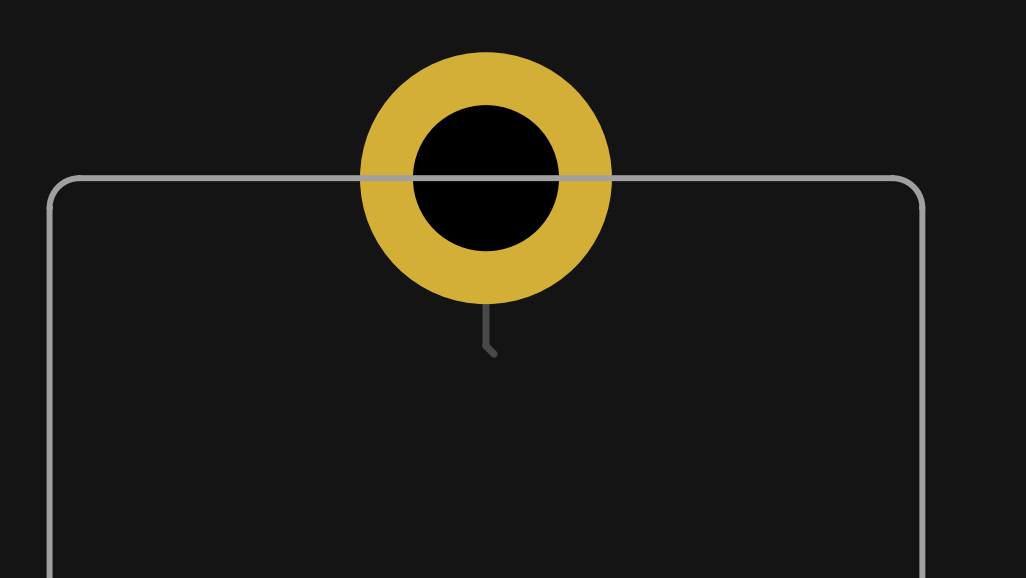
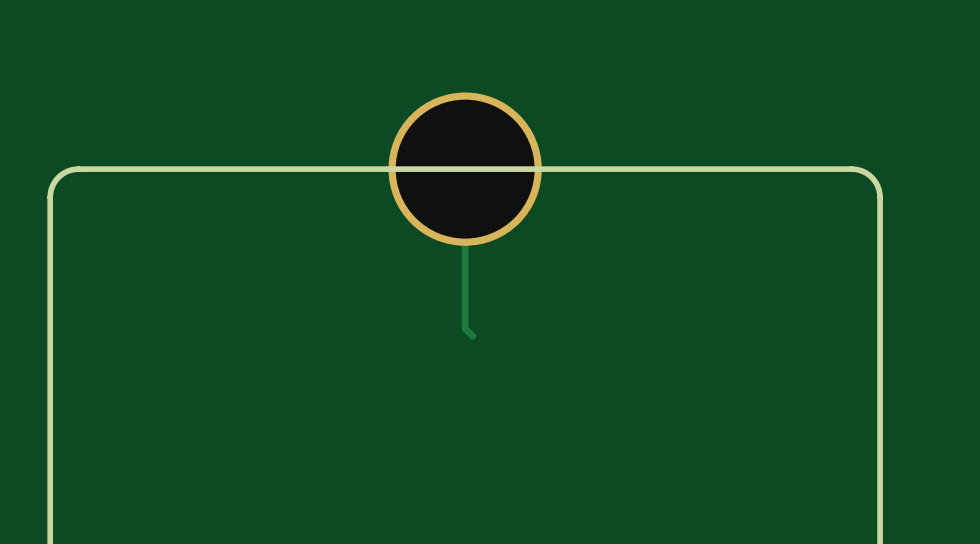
part footprint: [360, 52, 612, 305] -> [388, 92, 542, 246]

